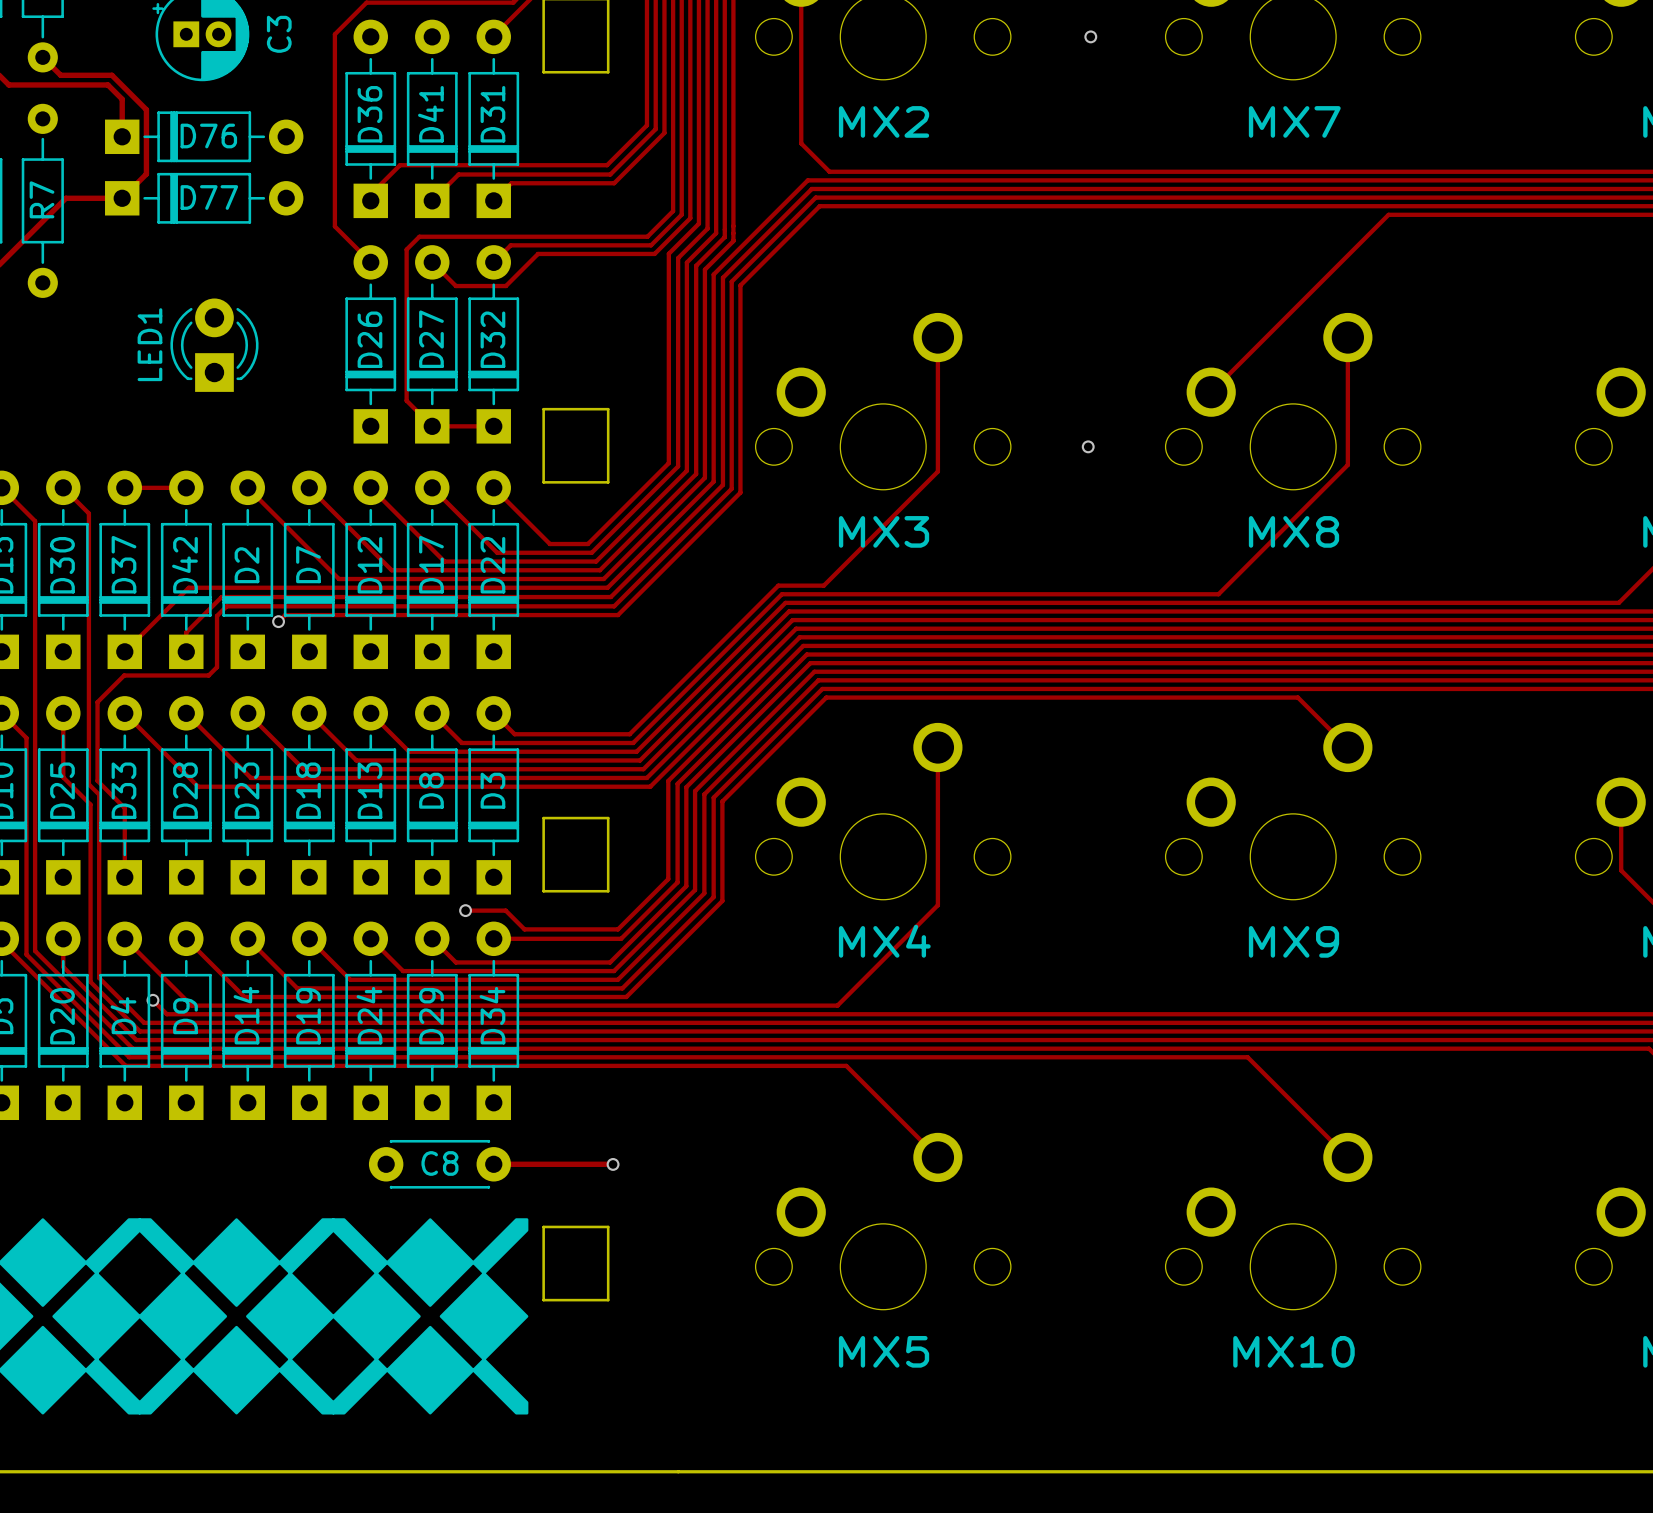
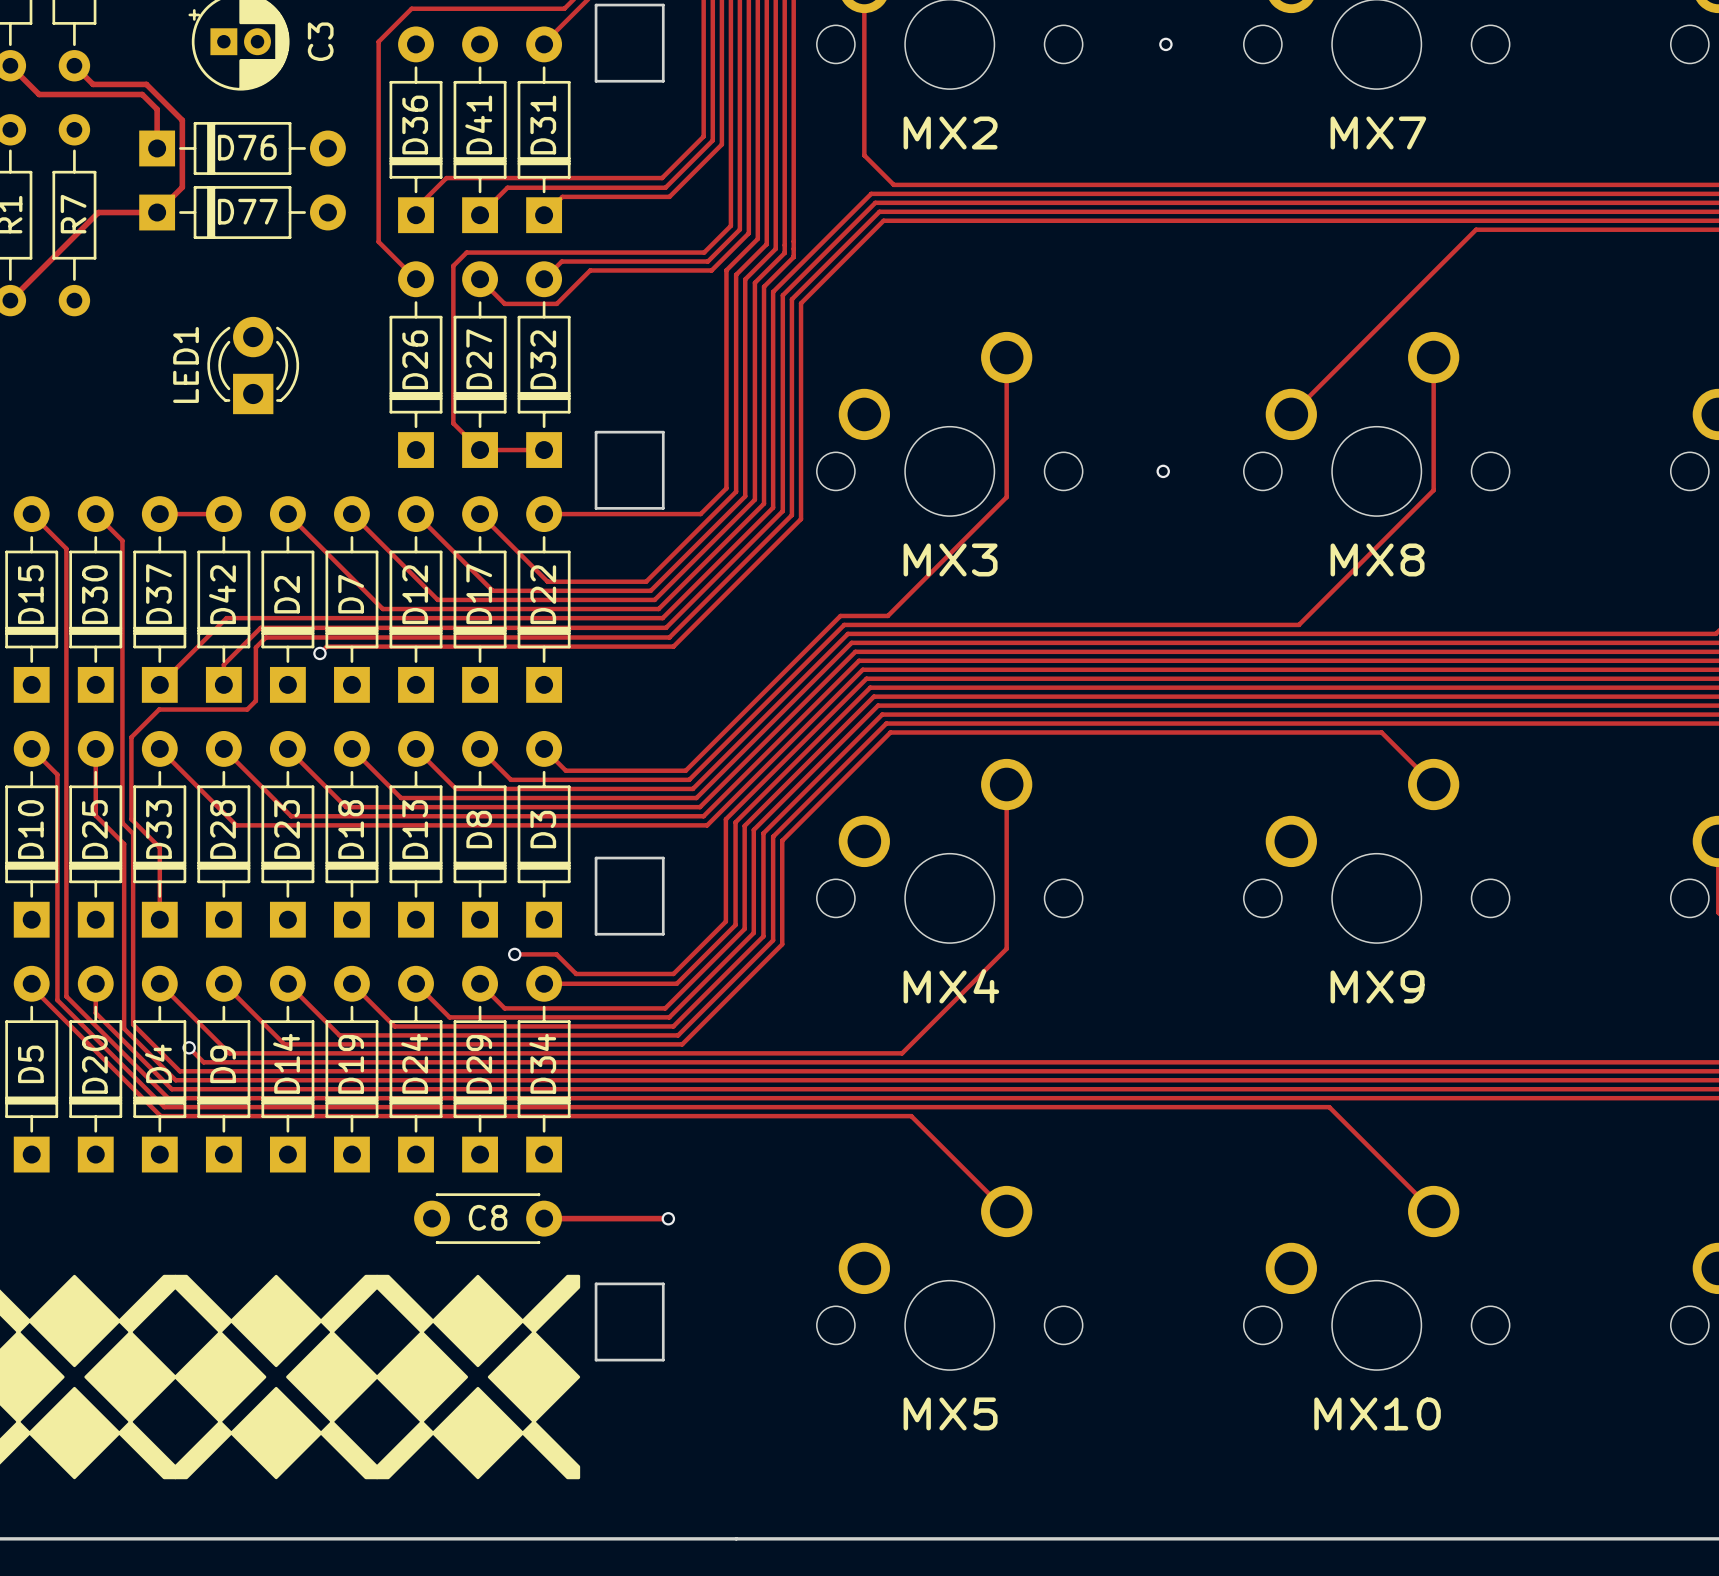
track: (493, 487) (549, 544) (587, 544) (644, 487) -> (544, 514) (700, 514)

